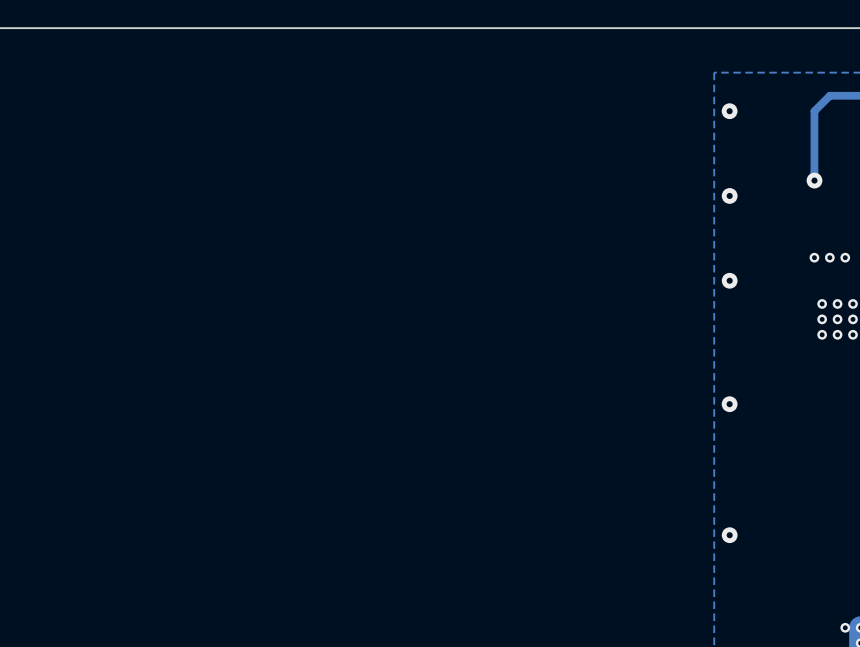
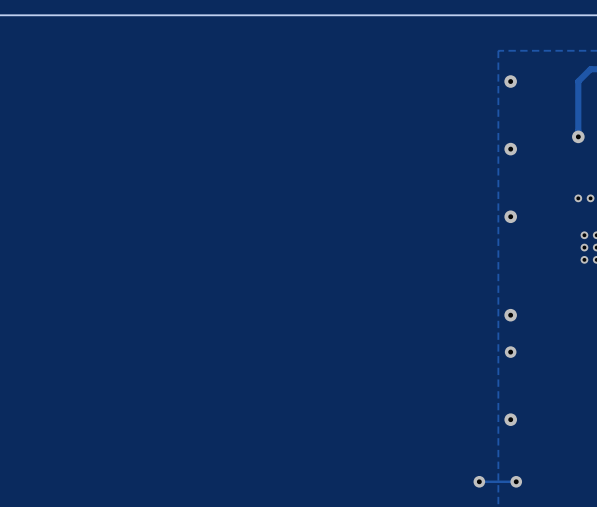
via: none -> (510, 352)
via: none -> (479, 481)
track: none -> (516, 481) (479, 481)
via: none -> (516, 481)

